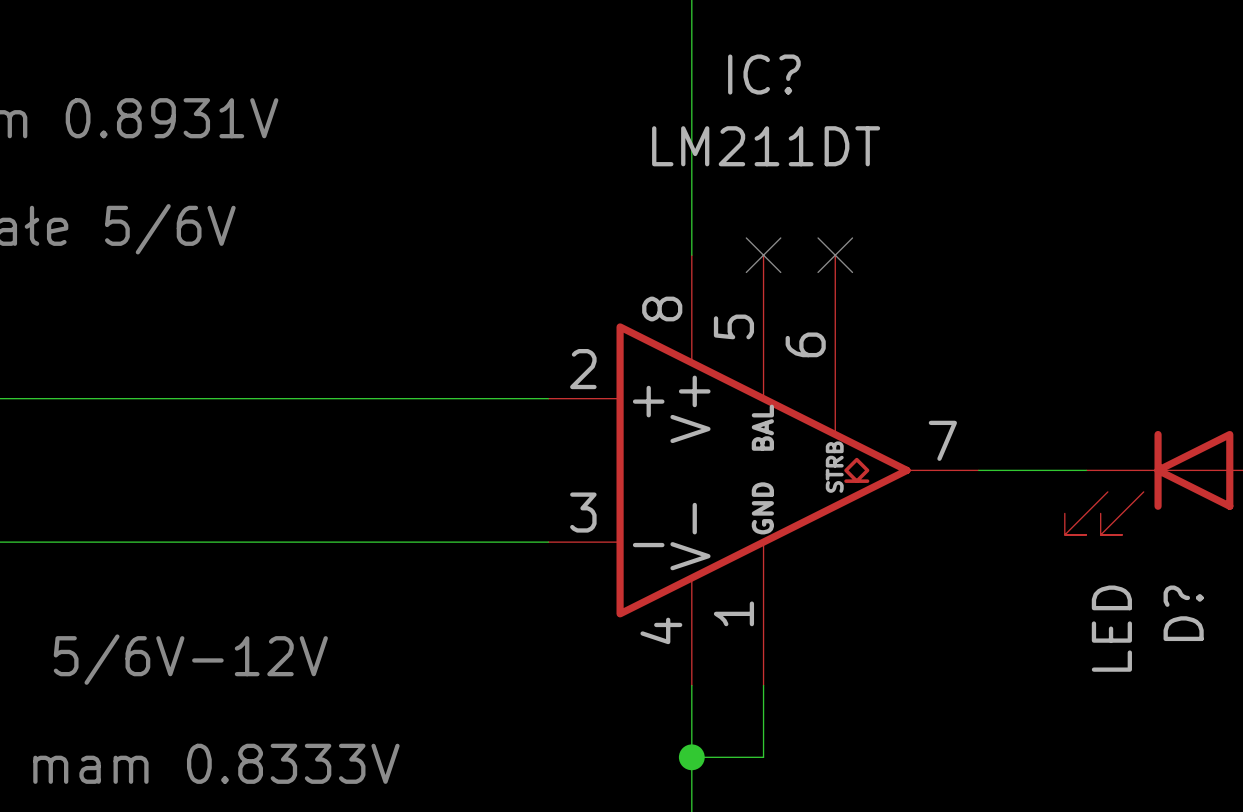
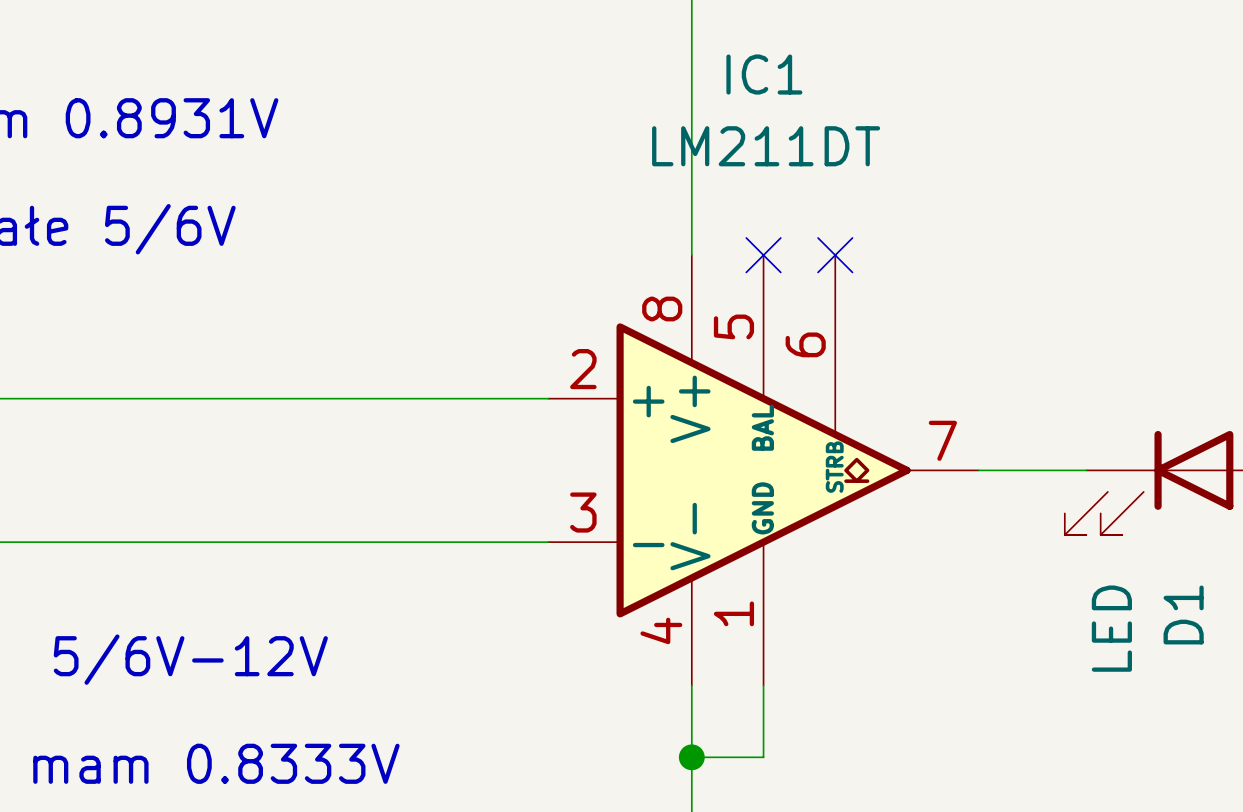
IC? name: IC? (764, 74) -> IC1 (764, 74)
D? name: D? (1183, 613) -> D1 (1183, 614)

